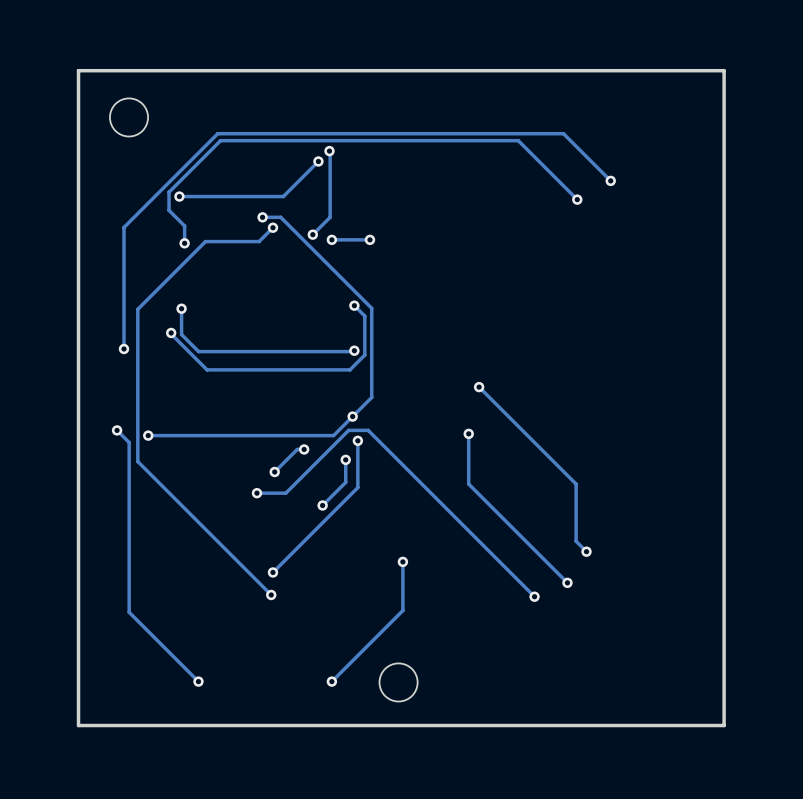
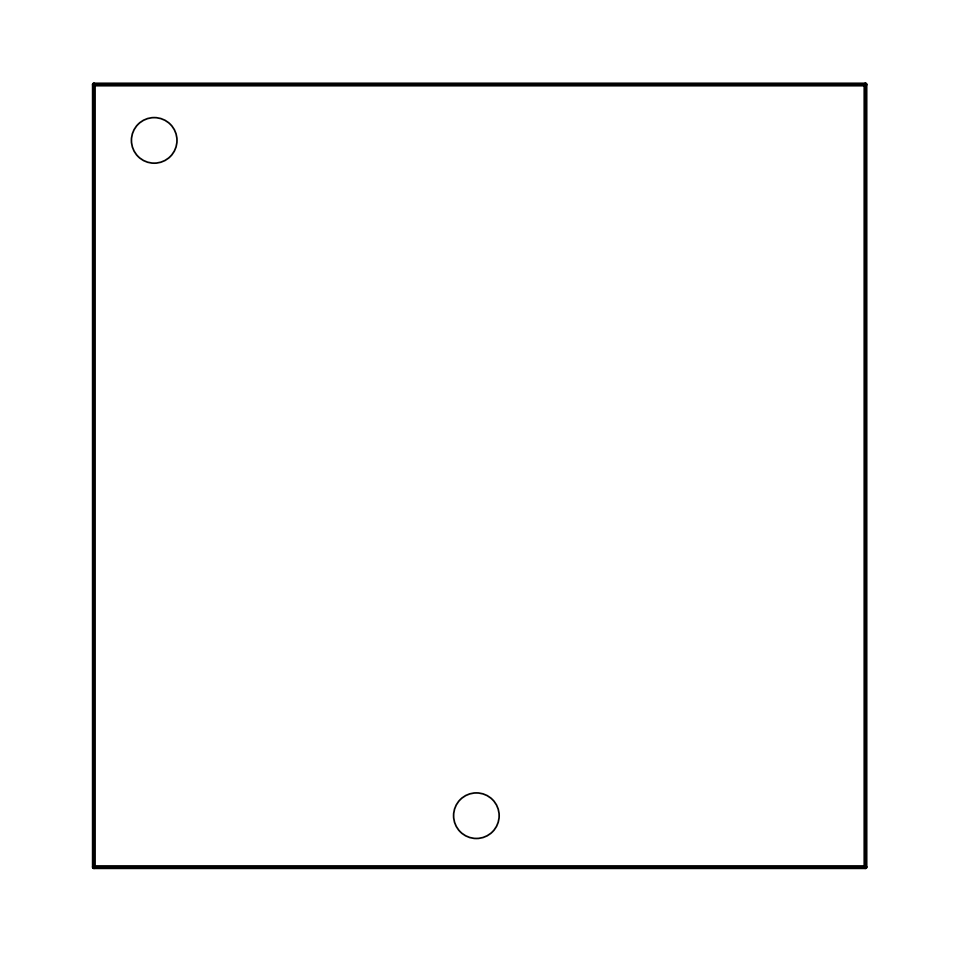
track: (329, 151) (330, 217) (312, 234) -> none
via: (329, 151) -> none
track: (318, 161) (283, 196) (179, 196) -> none
via: (318, 161) -> none
track: (610, 180) (563, 133) (217, 133) (123, 227) (123, 348) -> none
via: (610, 180) -> none
via: (179, 196) -> none
track: (577, 199) (518, 140) (220, 140) (169, 192) (169, 210) (184, 225) (184, 243) -> none
via: (577, 199) -> none
track: (262, 217) (280, 217) (371, 308) (371, 397) (333, 435) (148, 435) -> none
via: (262, 217) -> none
track: (272, 227) (259, 241) (205, 241) (137, 309) (137, 461) (271, 594) -> none
via: (272, 227) -> none
via: (312, 234) -> none
via: (331, 239) -> none
track: (369, 239) (331, 239) -> none
via: (369, 239) -> none
via: (184, 243) -> none
track: (354, 305) (364, 316) (364, 355) (349, 369) (207, 369) (171, 332) -> none
via: (354, 305) -> none
track: (181, 308) (181, 334) (198, 351) (354, 350) -> none
via: (181, 308) -> none
via: (171, 332) -> none
via: (123, 348) -> none
via: (354, 350) -> none
track: (479, 387) (576, 484) (576, 541) (586, 551) -> none
via: (479, 387) -> none
via: (352, 416) -> none
track: (117, 430) (129, 442) (129, 612) (198, 681) -> none
via: (117, 430) -> none
track: (468, 433) (468, 484) (567, 582) -> none
via: (468, 433) -> none
via: (148, 435) -> none
track: (357, 440) (357, 487) (272, 572) -> none
via: (357, 440) -> none
track: (304, 449) (297, 449) (274, 471) -> none
via: (304, 449) -> none
track: (345, 459) (345, 482) (322, 505) -> none
via: (345, 459) -> none
via: (274, 471) -> none
track: (256, 493) (285, 493) (348, 430) (368, 430) (534, 596) -> none
via: (256, 493) -> none
via: (322, 505) -> none
via: (586, 551) -> none
track: (402, 561) (402, 610) (331, 681) -> none
via: (402, 561) -> none
via: (272, 572) -> none
via: (567, 582) -> none
via: (271, 594) -> none
via: (534, 596) -> none
via: (198, 681) -> none
via: (331, 681) -> none

